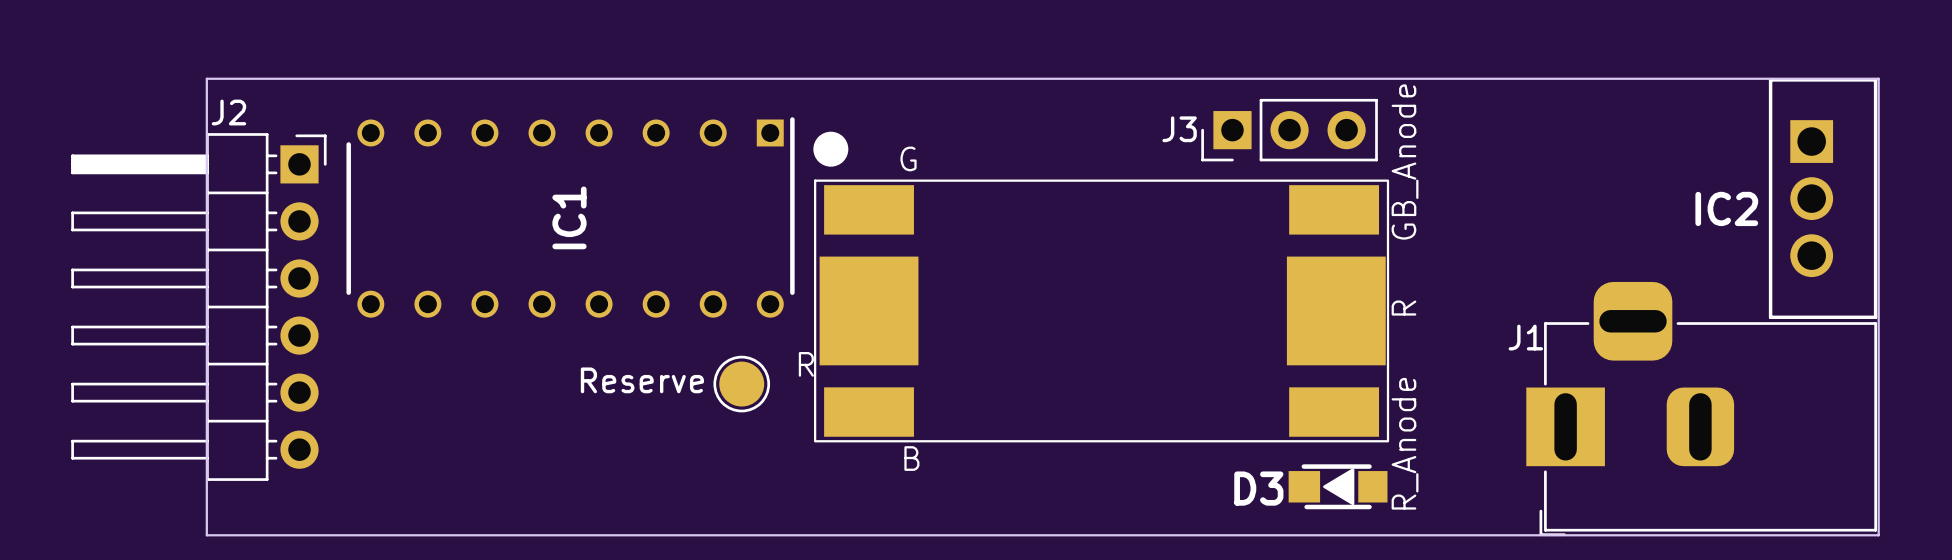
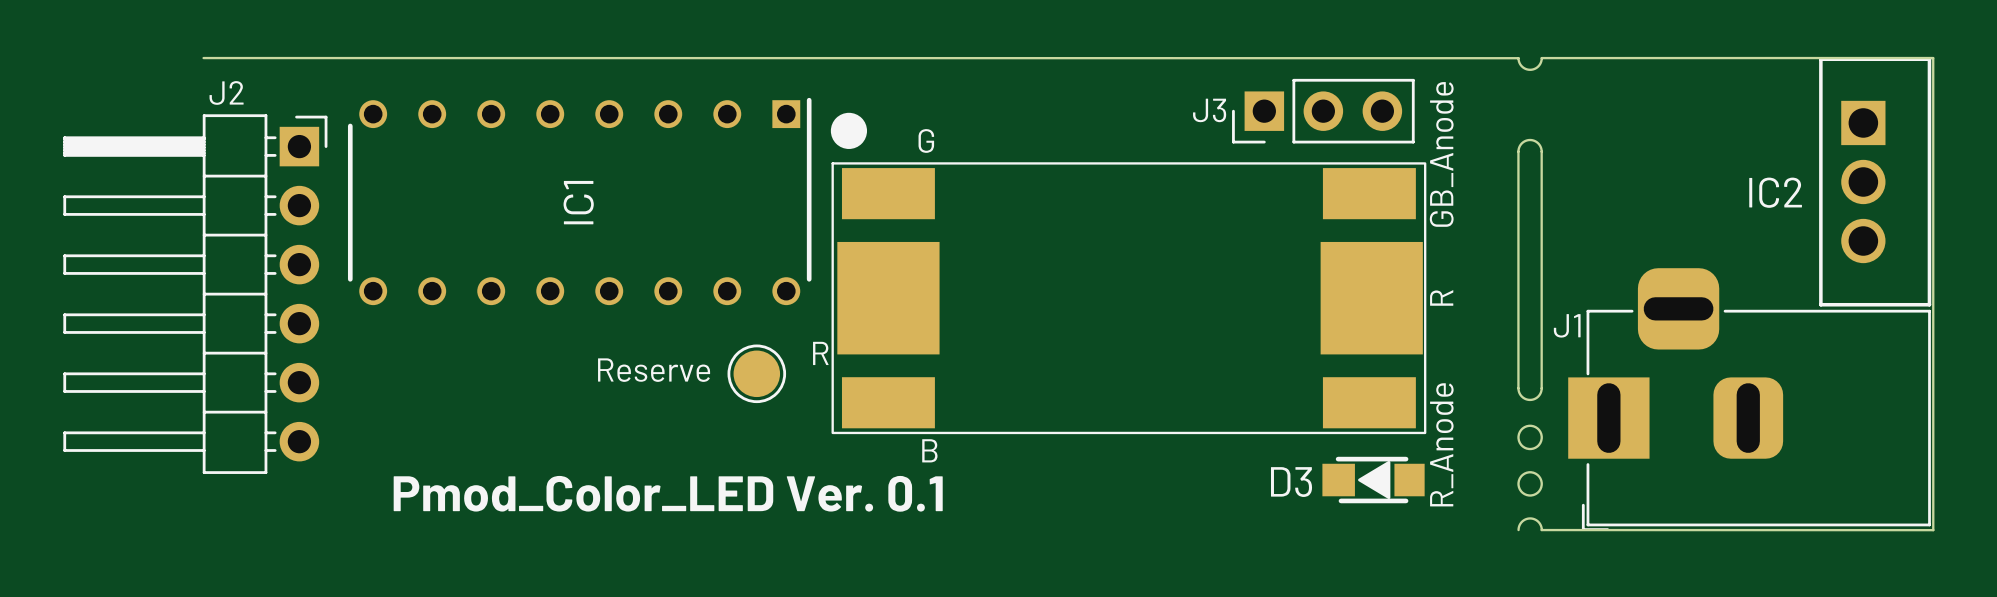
board edge: (206, 78) (1878, 78) (1878, 535) (206, 535) (206, 78) -> (203, 58) (1518, 58) (1521, 66) (1530, 69) (1538, 66) (1541, 58)
board edge: none -> (1541, 58) (1933, 58) (1933, 530) (1541, 530) (1538, 522) (1530, 518) (1521, 522) (1518, 530)
board edge: none -> (1518, 151) (1518, 388) (1521, 396) (1530, 399) (1538, 396) (1541, 388) (1541, 151) (1538, 143) (1530, 140) (1521, 143) (1518, 151)
round board edge: none -> [1517, 424, 1543, 451]
round board edge: none -> [1517, 471, 1543, 497]
text: none -> Pmod_Color_LED Ver. 0.1 (668, 493)

